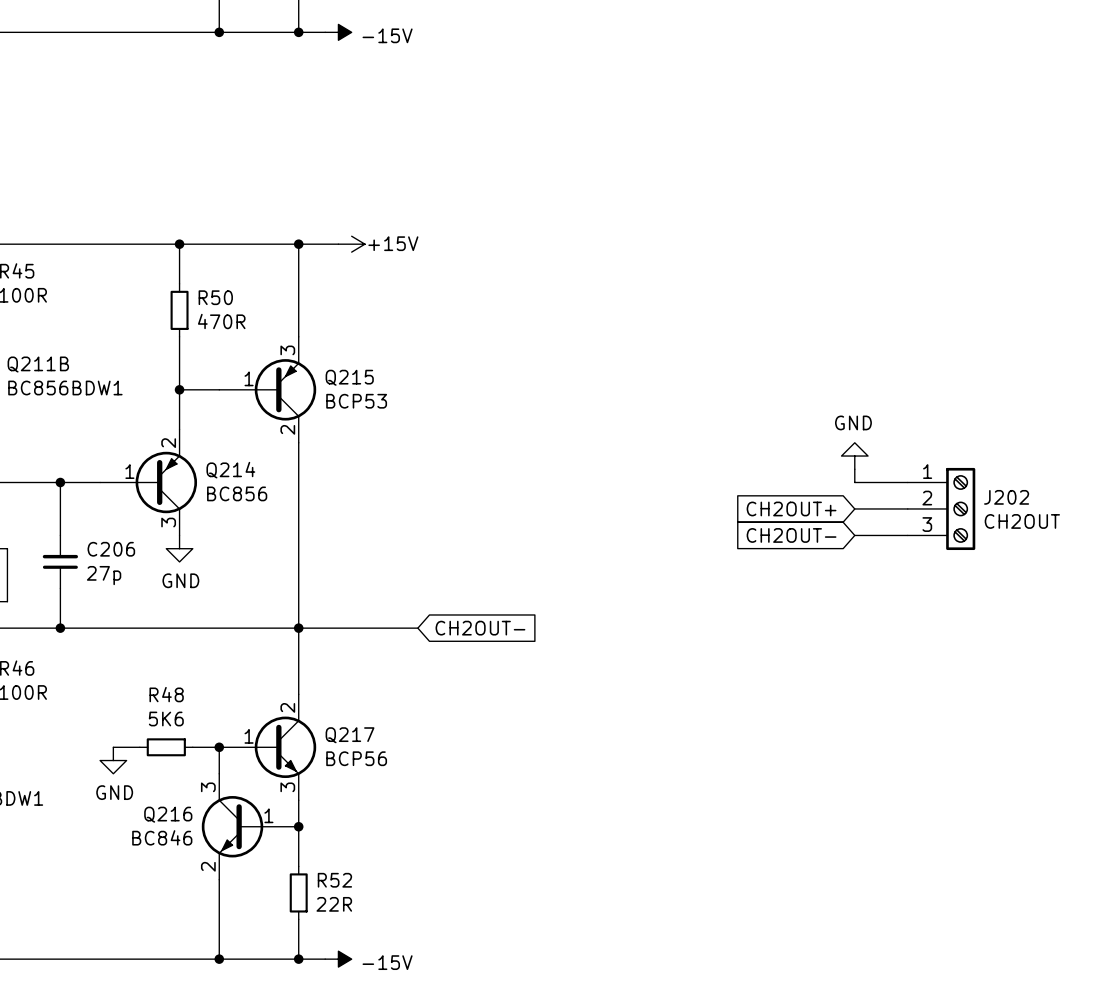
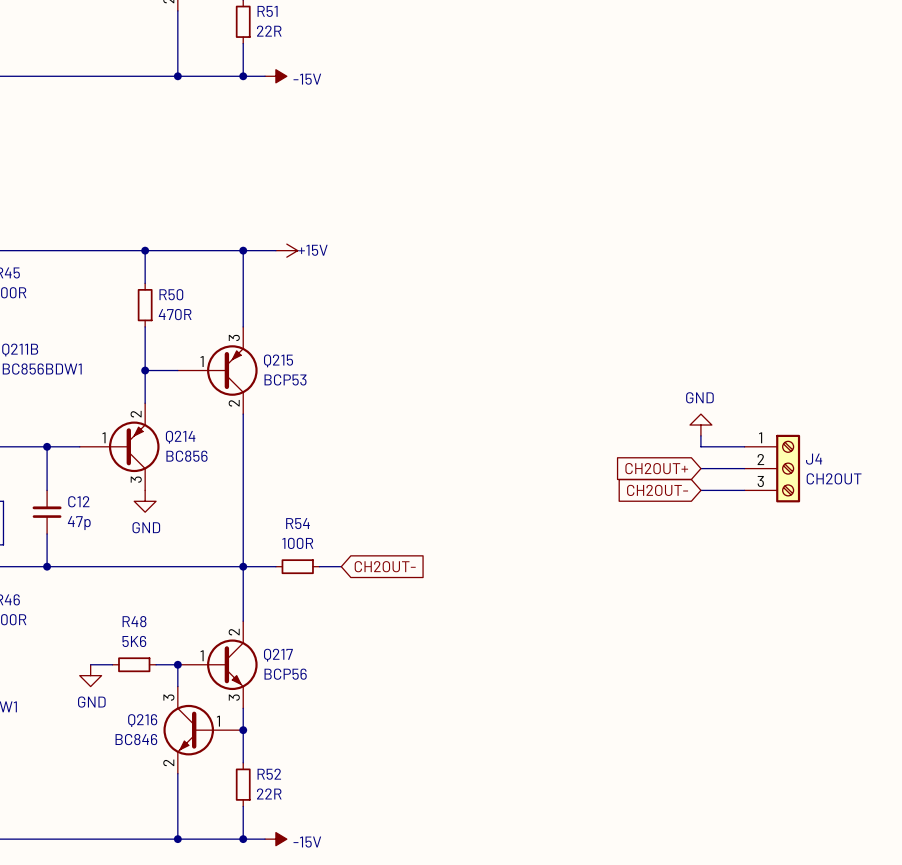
J202 name: J202 (1006, 497) -> J4 (814, 459)
C206 name: C206 (111, 549) -> C12 (78, 501)
C206 value: 27p (104, 575) -> 47p (79, 523)
wire: (338, 628) (391, 628) -> none
R54: none -> 100R (297, 566)

